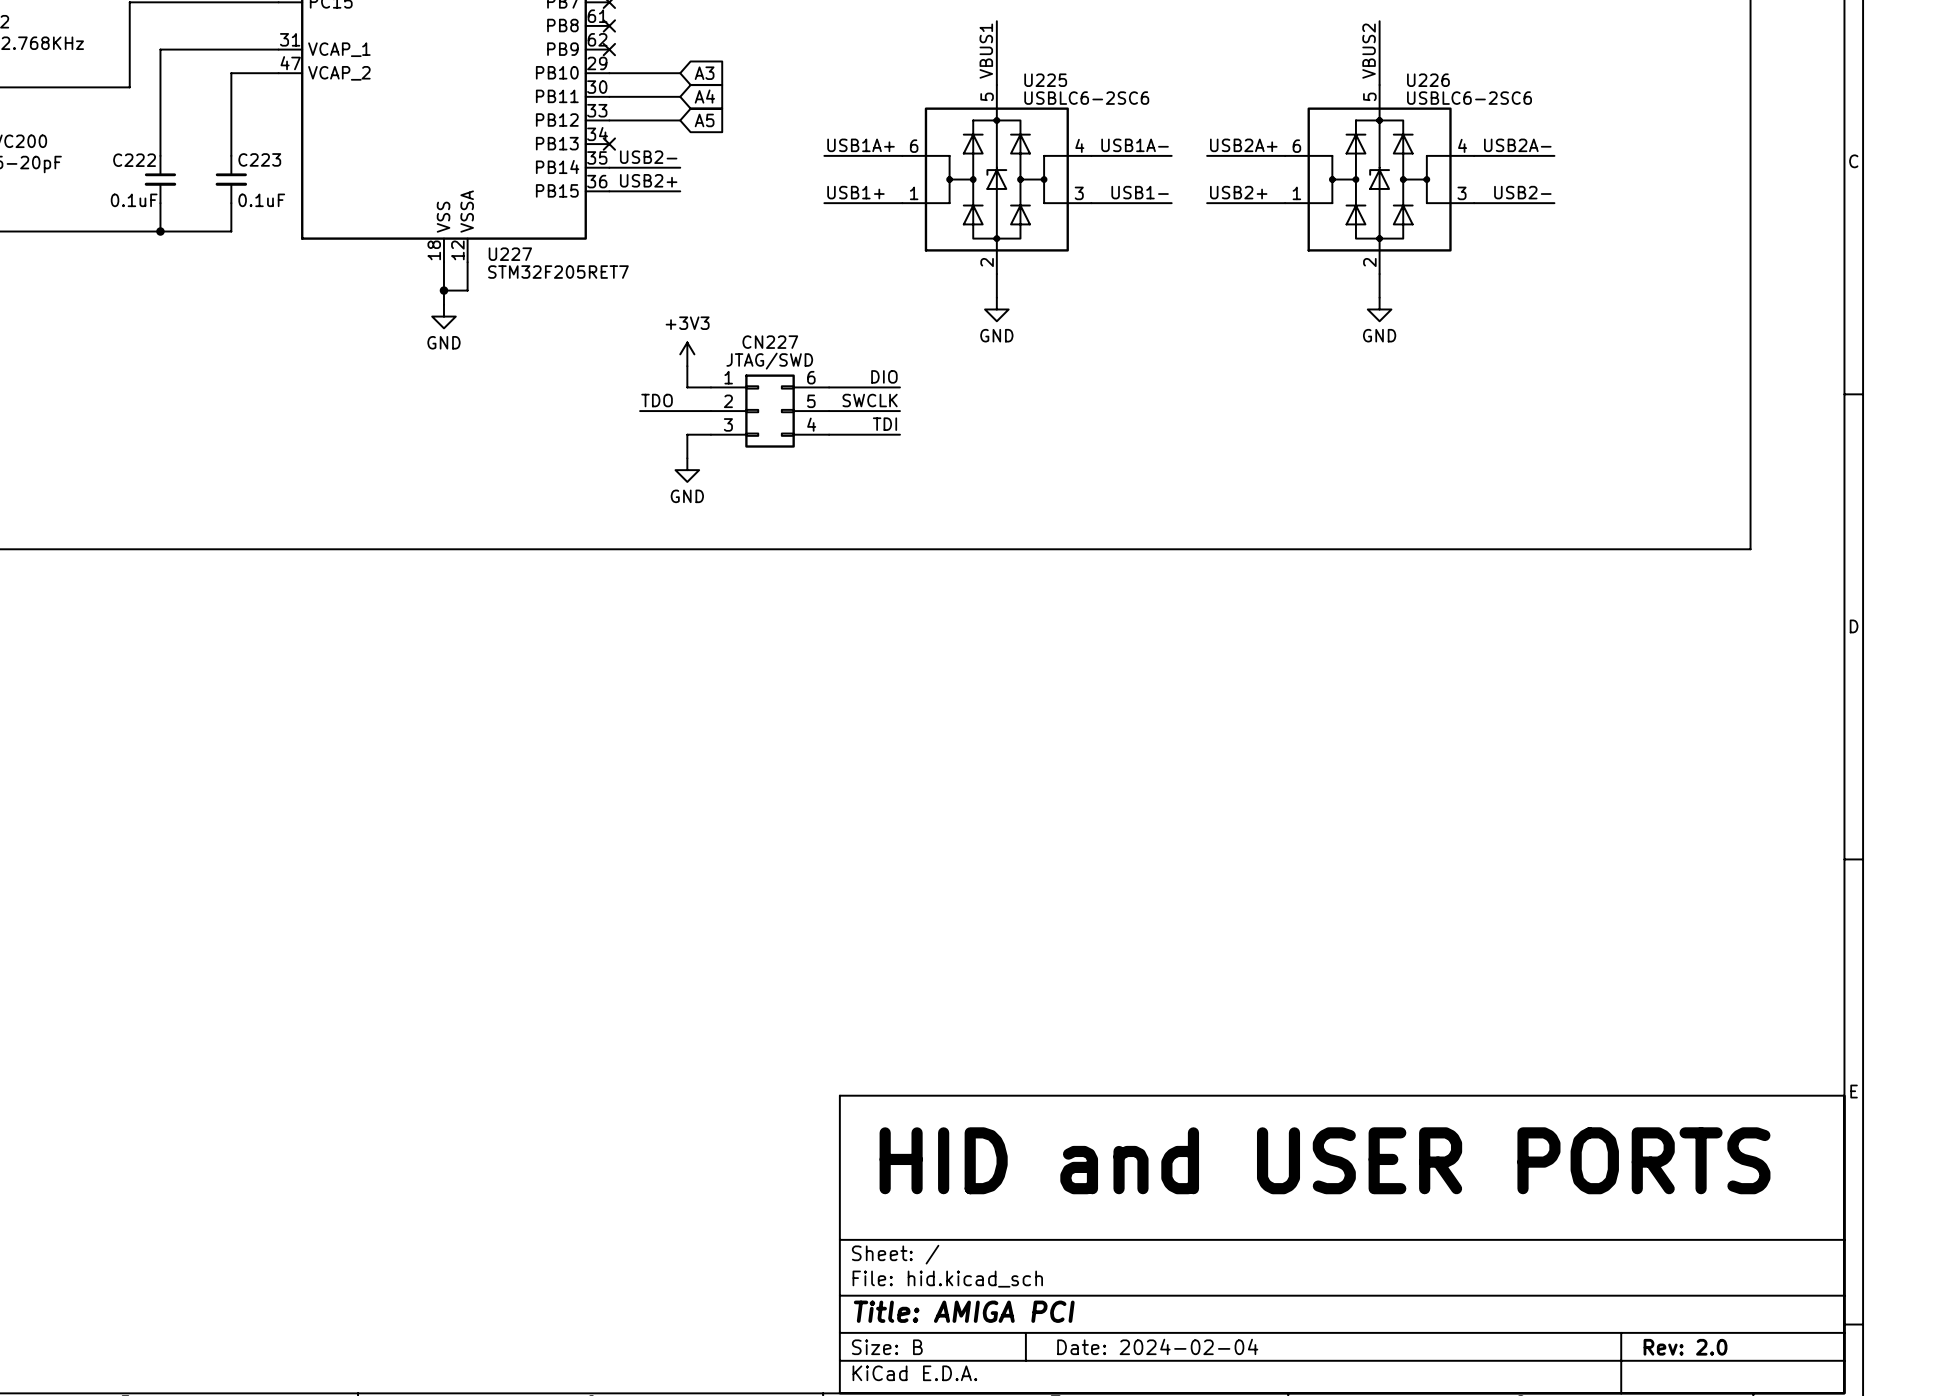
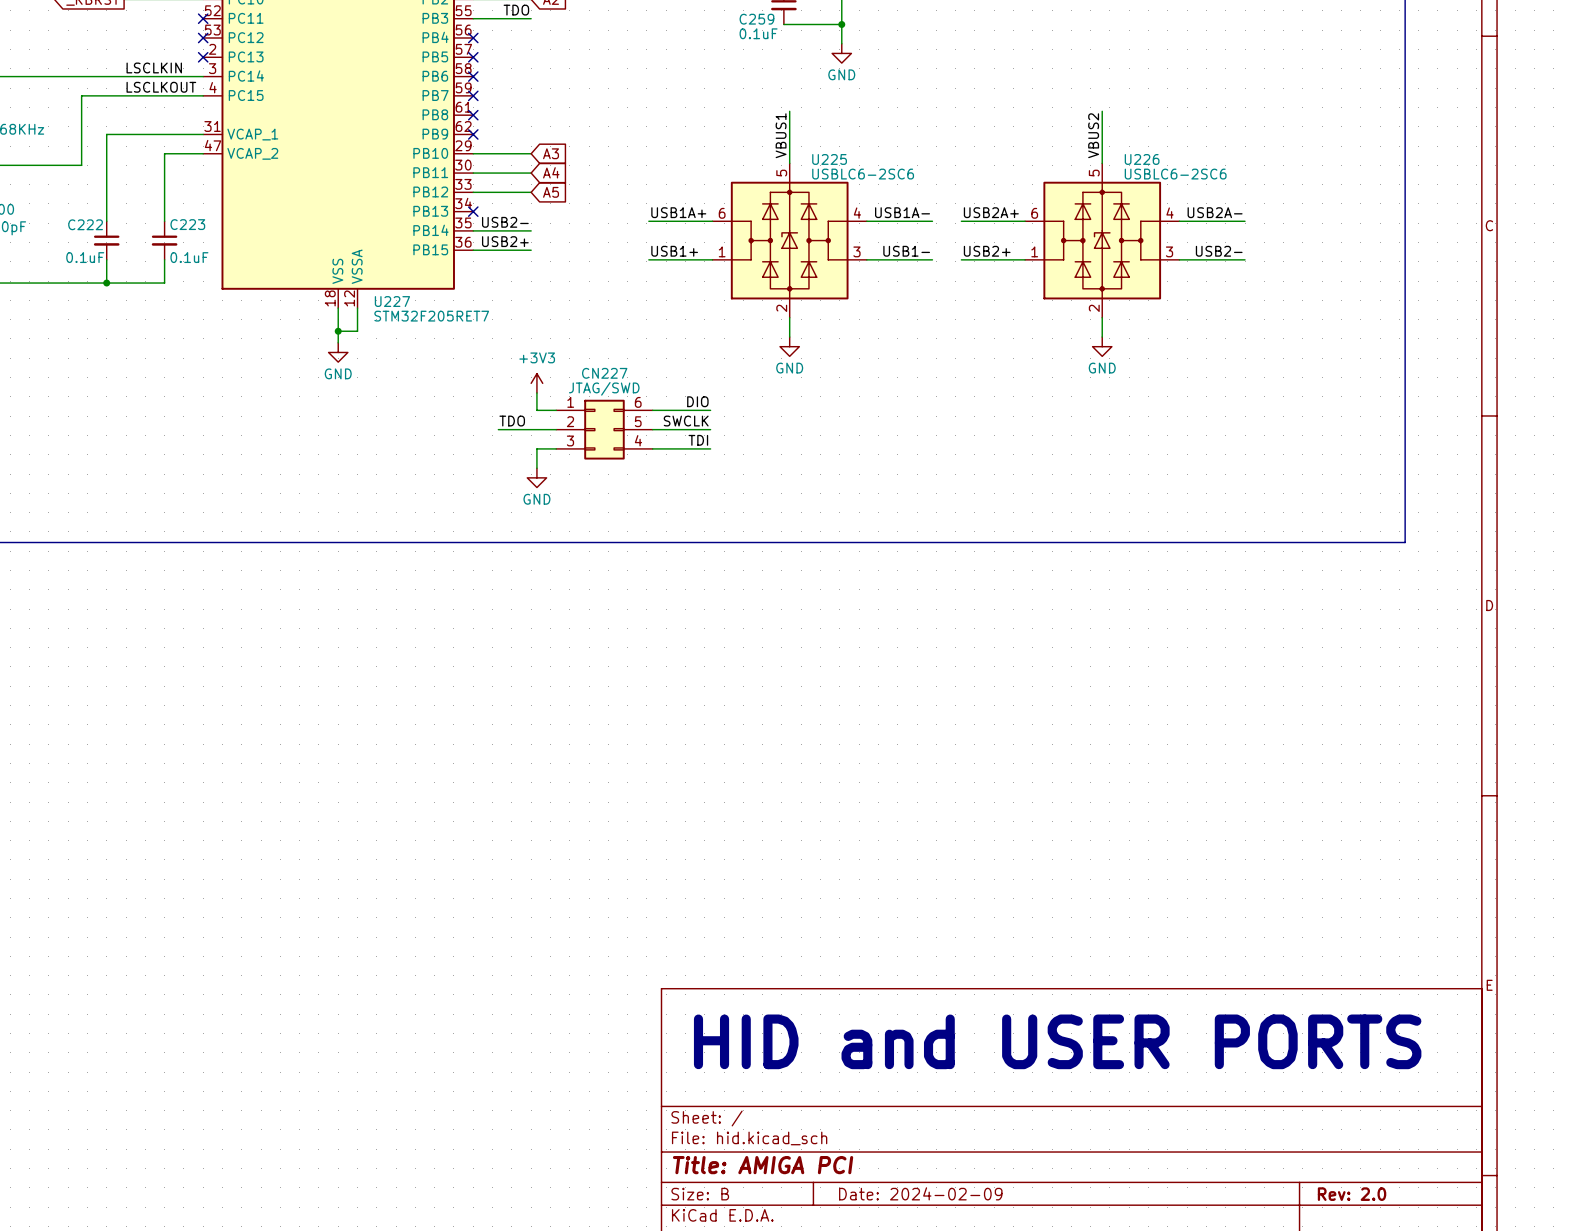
title block: Date: 2024-02-04 (1157, 1346) -> Date: 2024-02-09 (920, 1193)

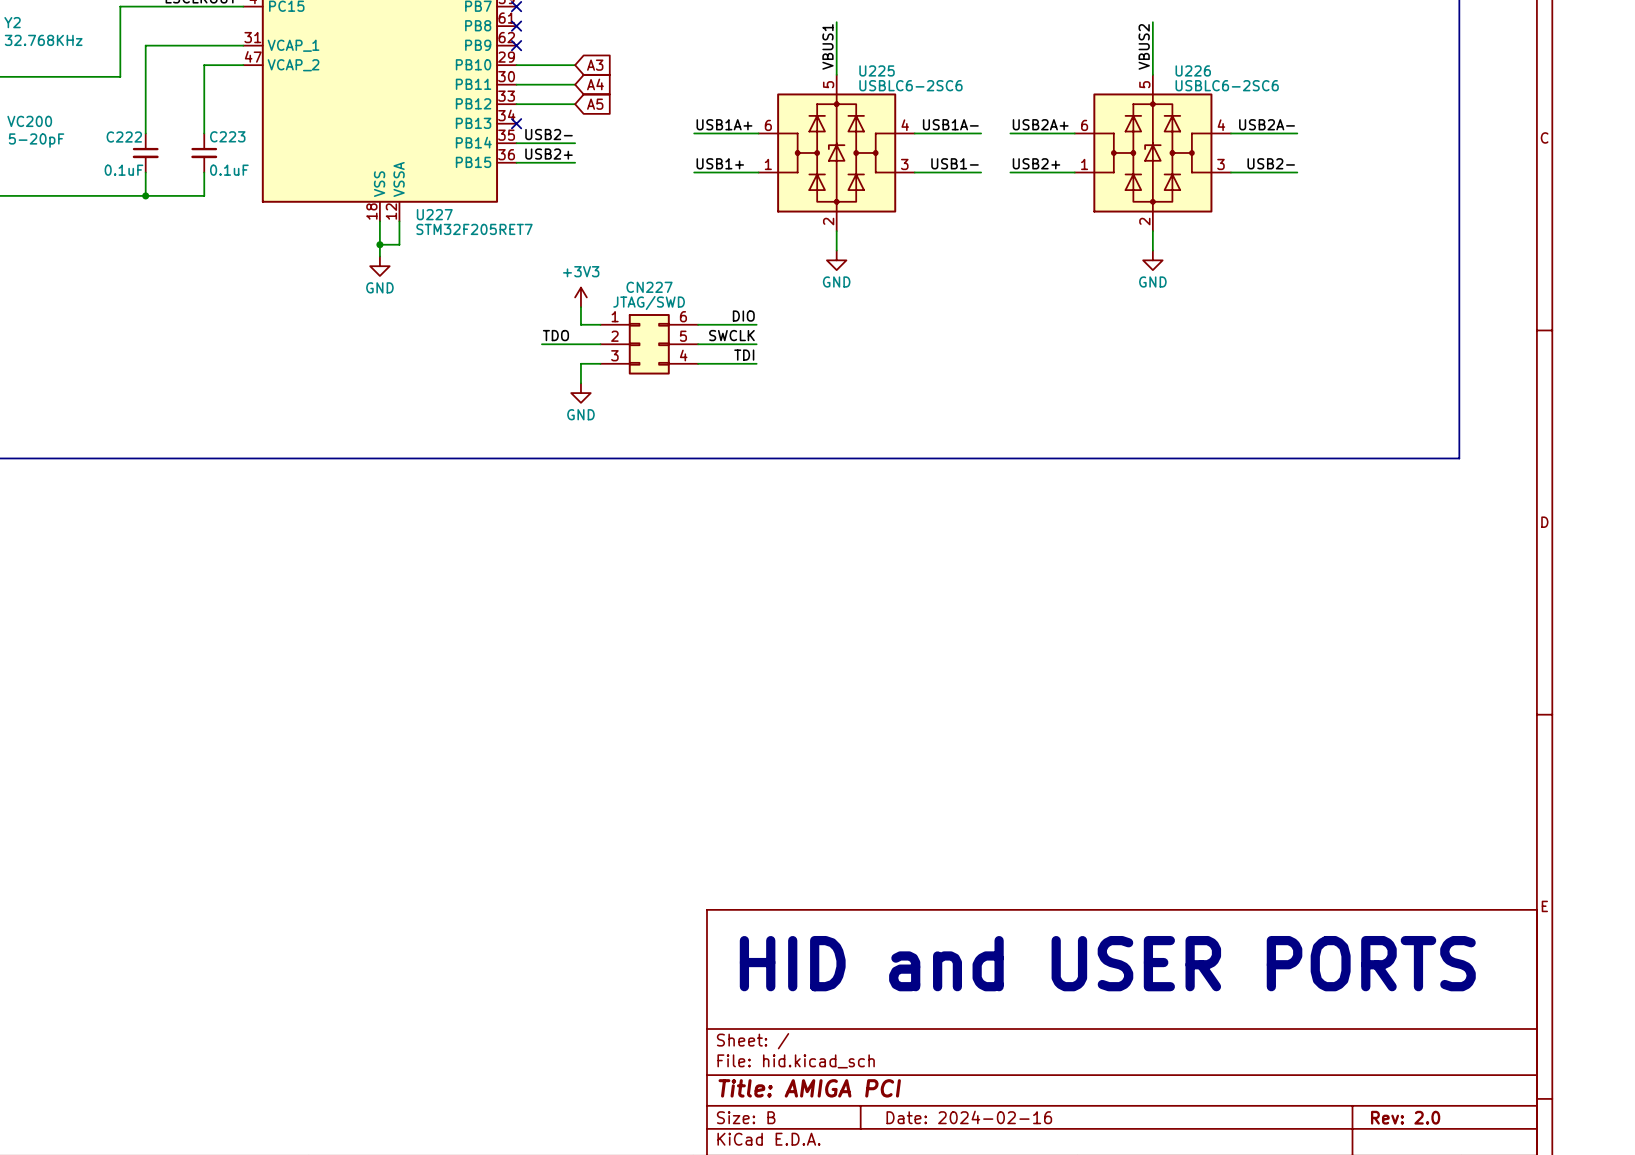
title block: Date: 2024-02-09 (920, 1193) -> Date: 2024-02-16 (969, 1117)

